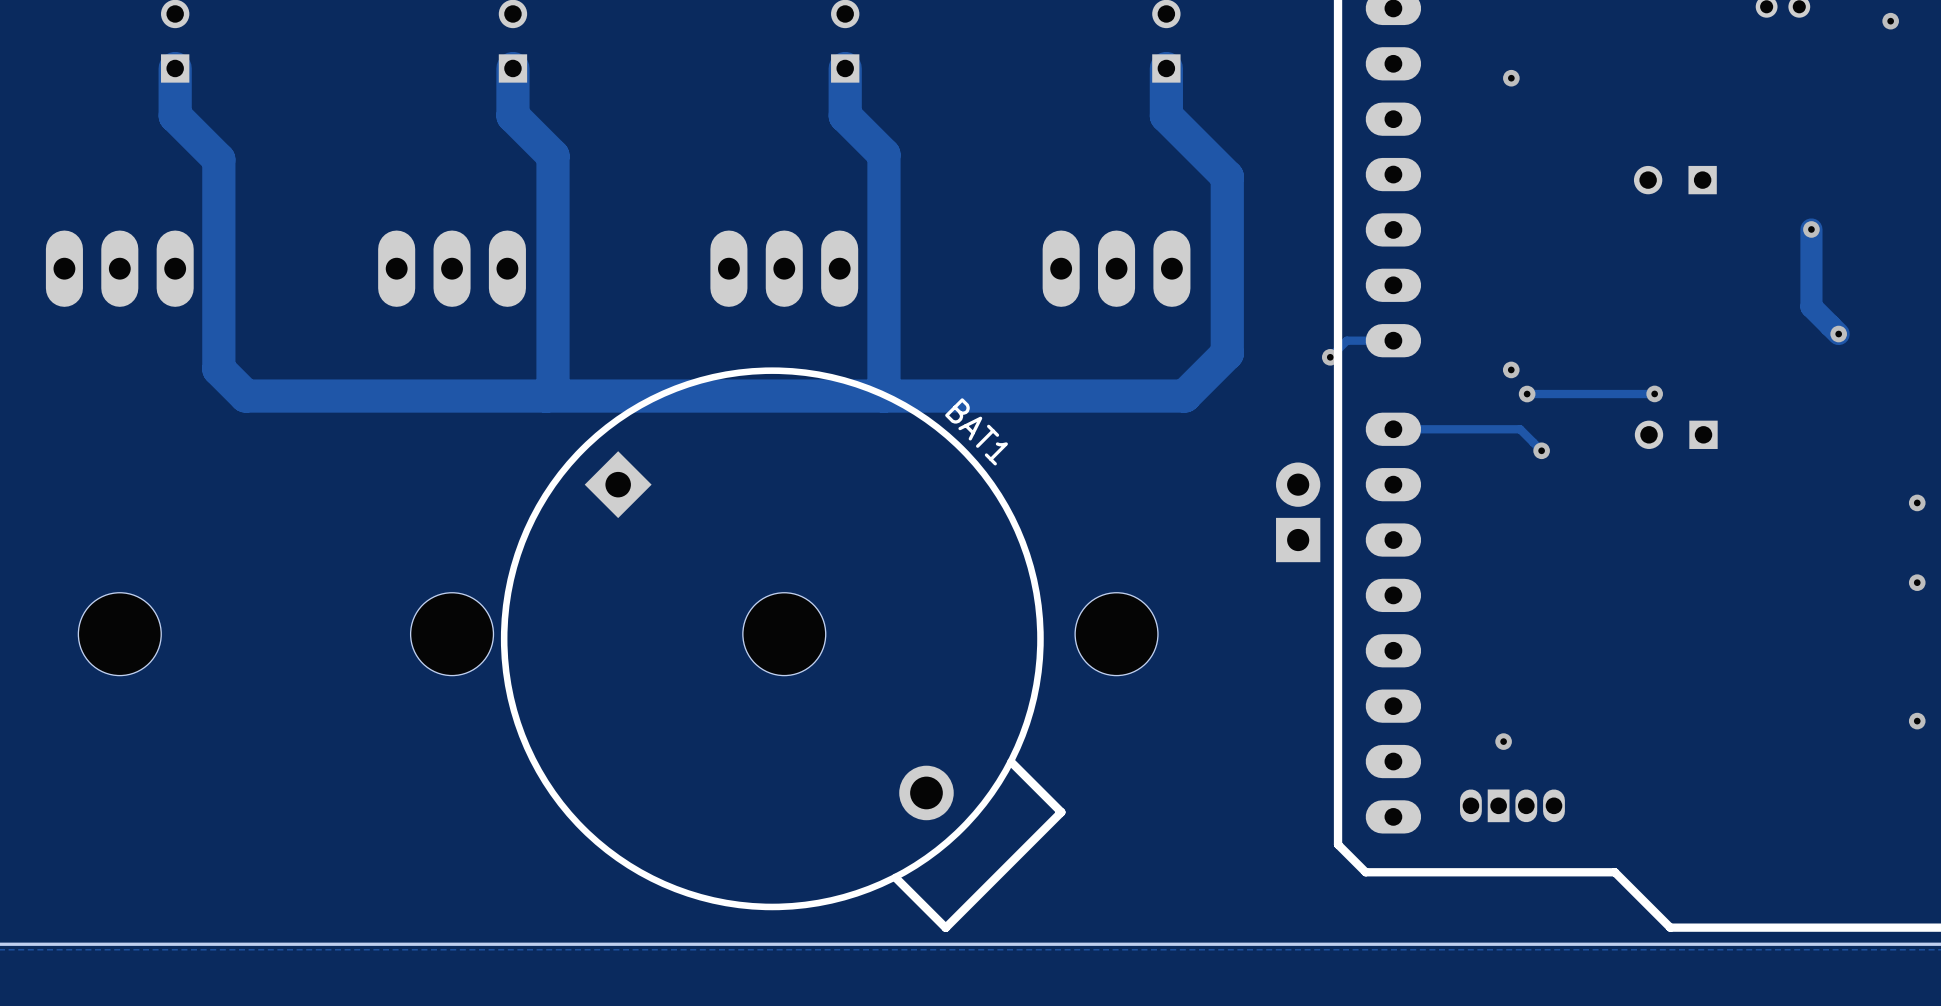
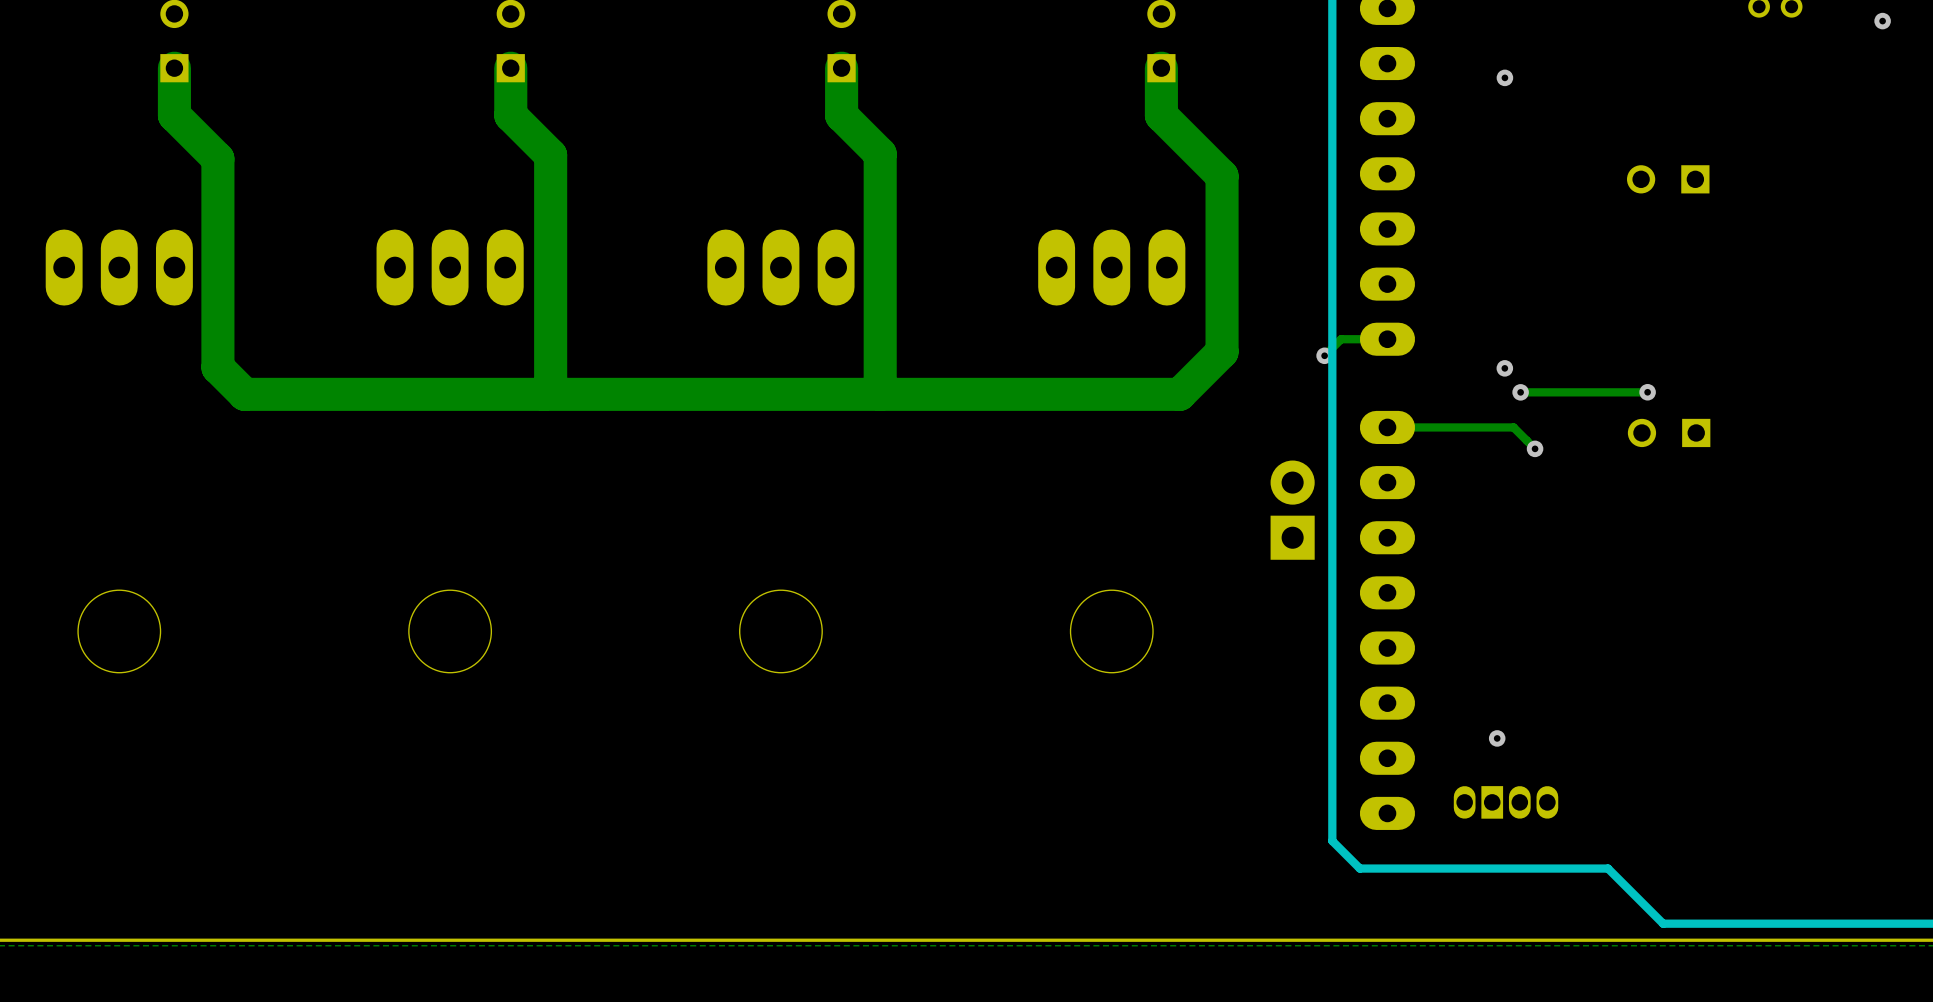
track: (1811, 229) (1811, 306) (1838, 334) -> none
via: (1811, 229) -> none
via: (1838, 334) -> none
via: (1917, 502) -> none
via: (1917, 582) -> none
BAT1: (783, 649) -> none
via: (1917, 721) -> none

